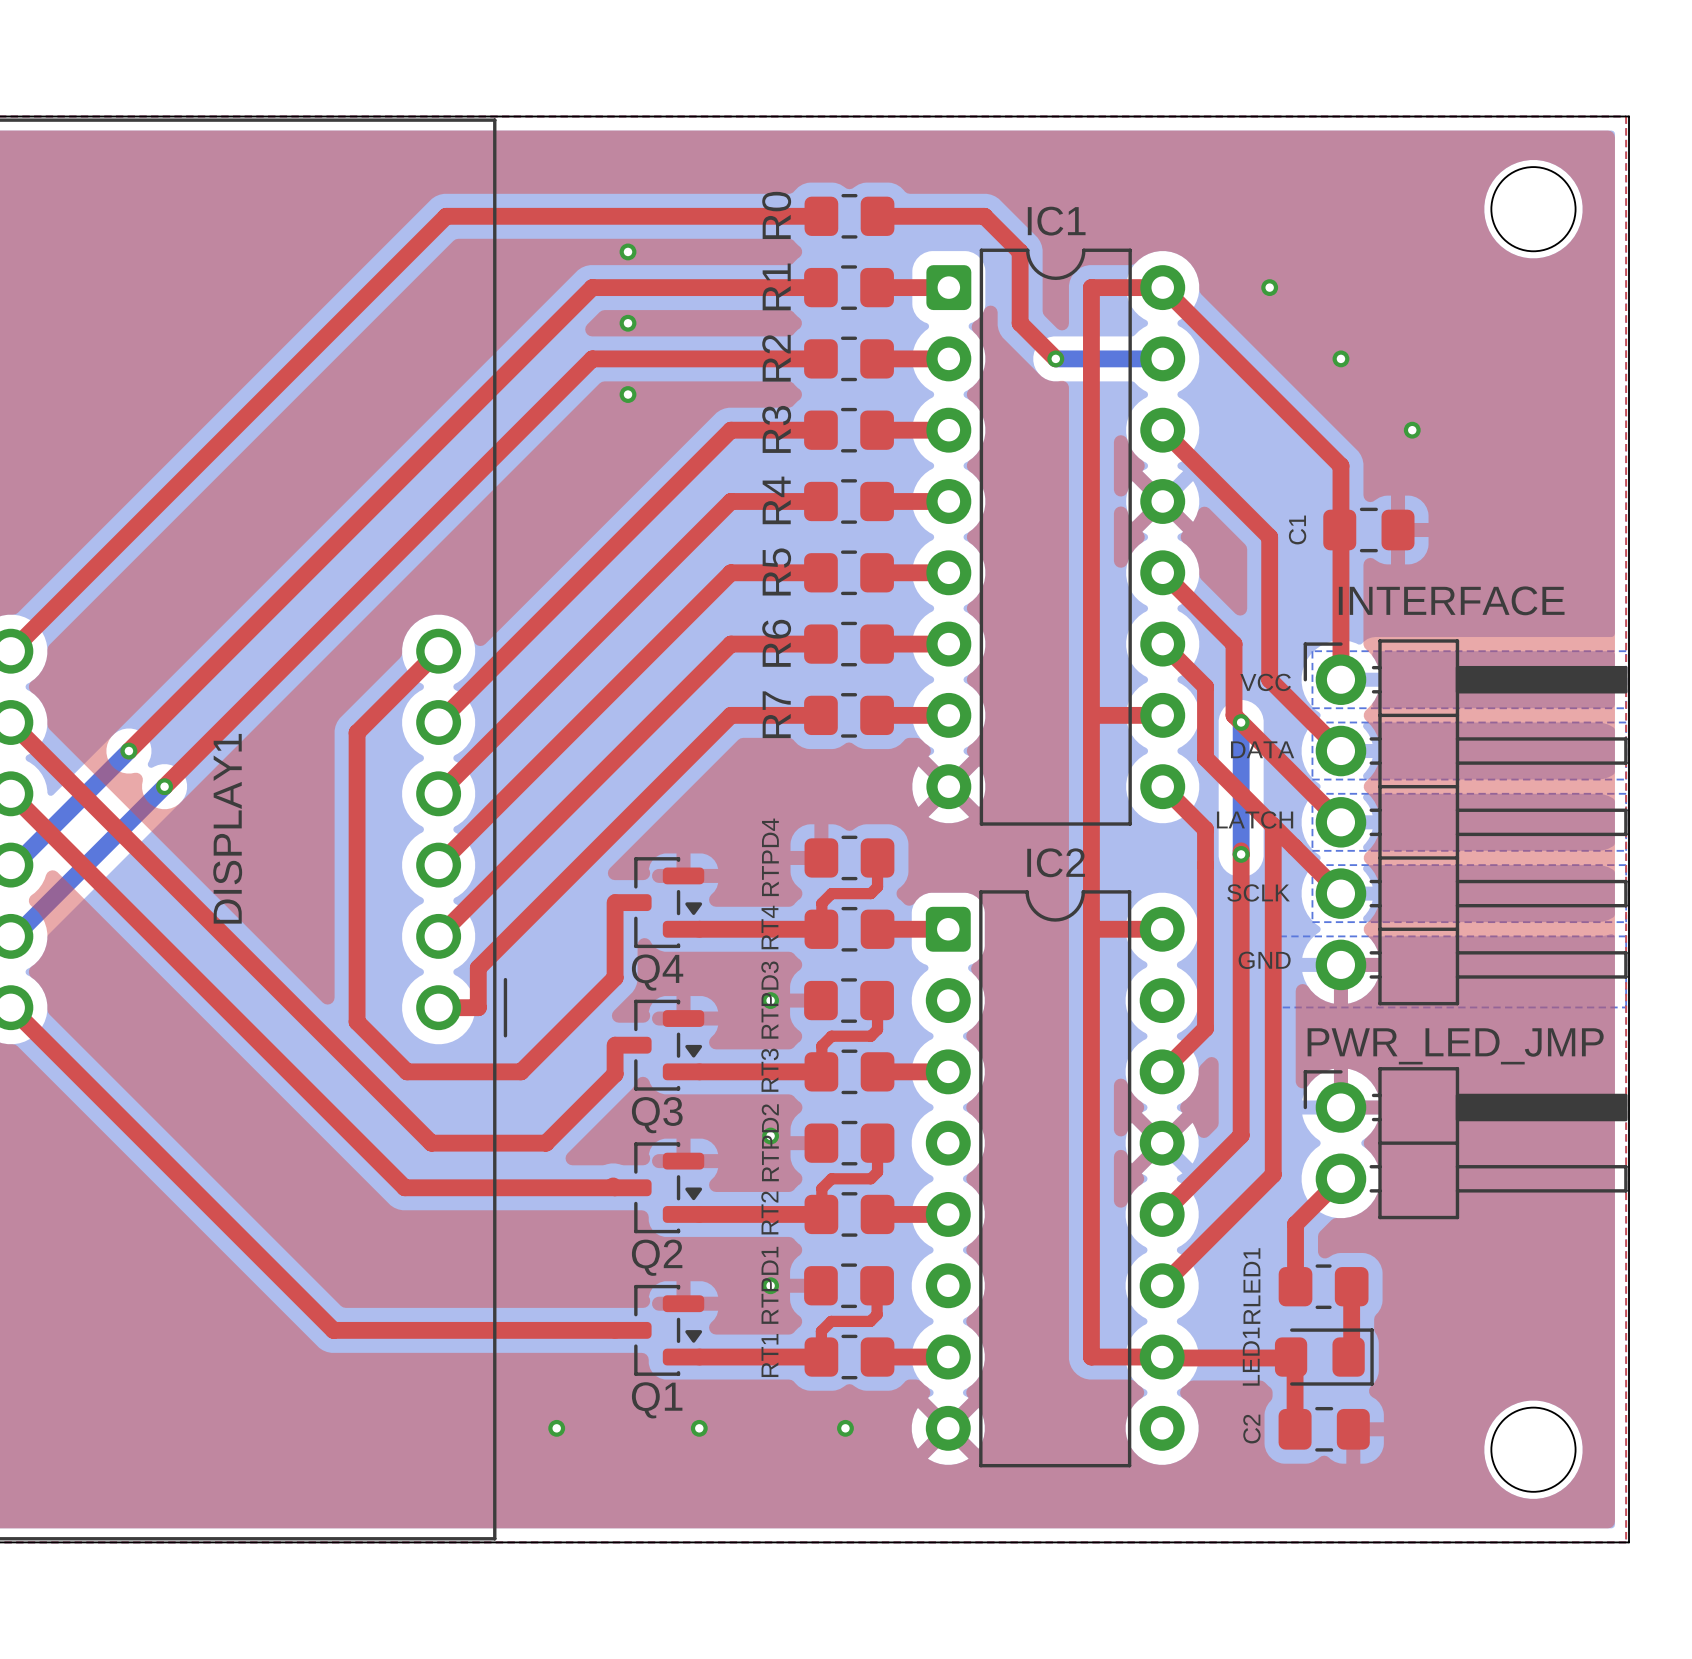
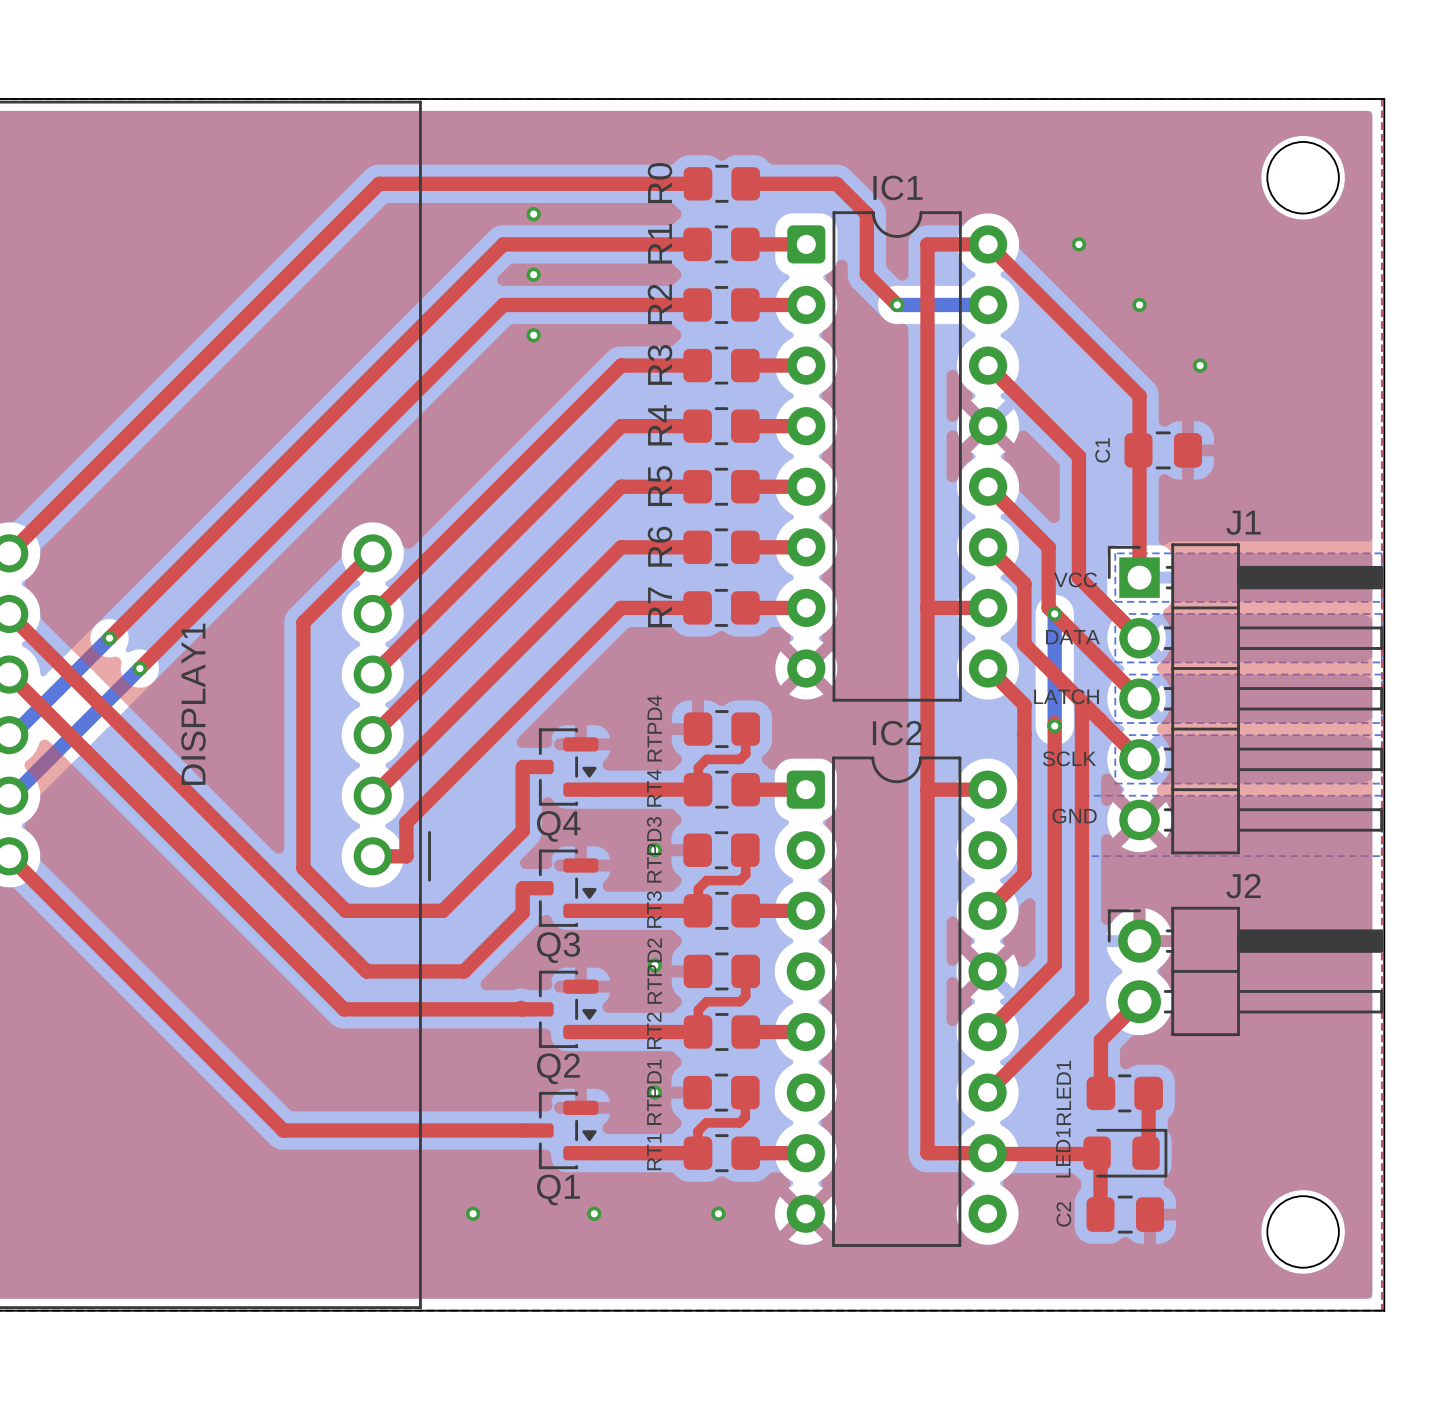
part: INTERFACE (1465, 822) -> none
J1: none -> (1245, 698)
J2 name: none -> J2 (1243, 886)
J2 value: PWR_LED_JMP (1455, 1046) -> none

